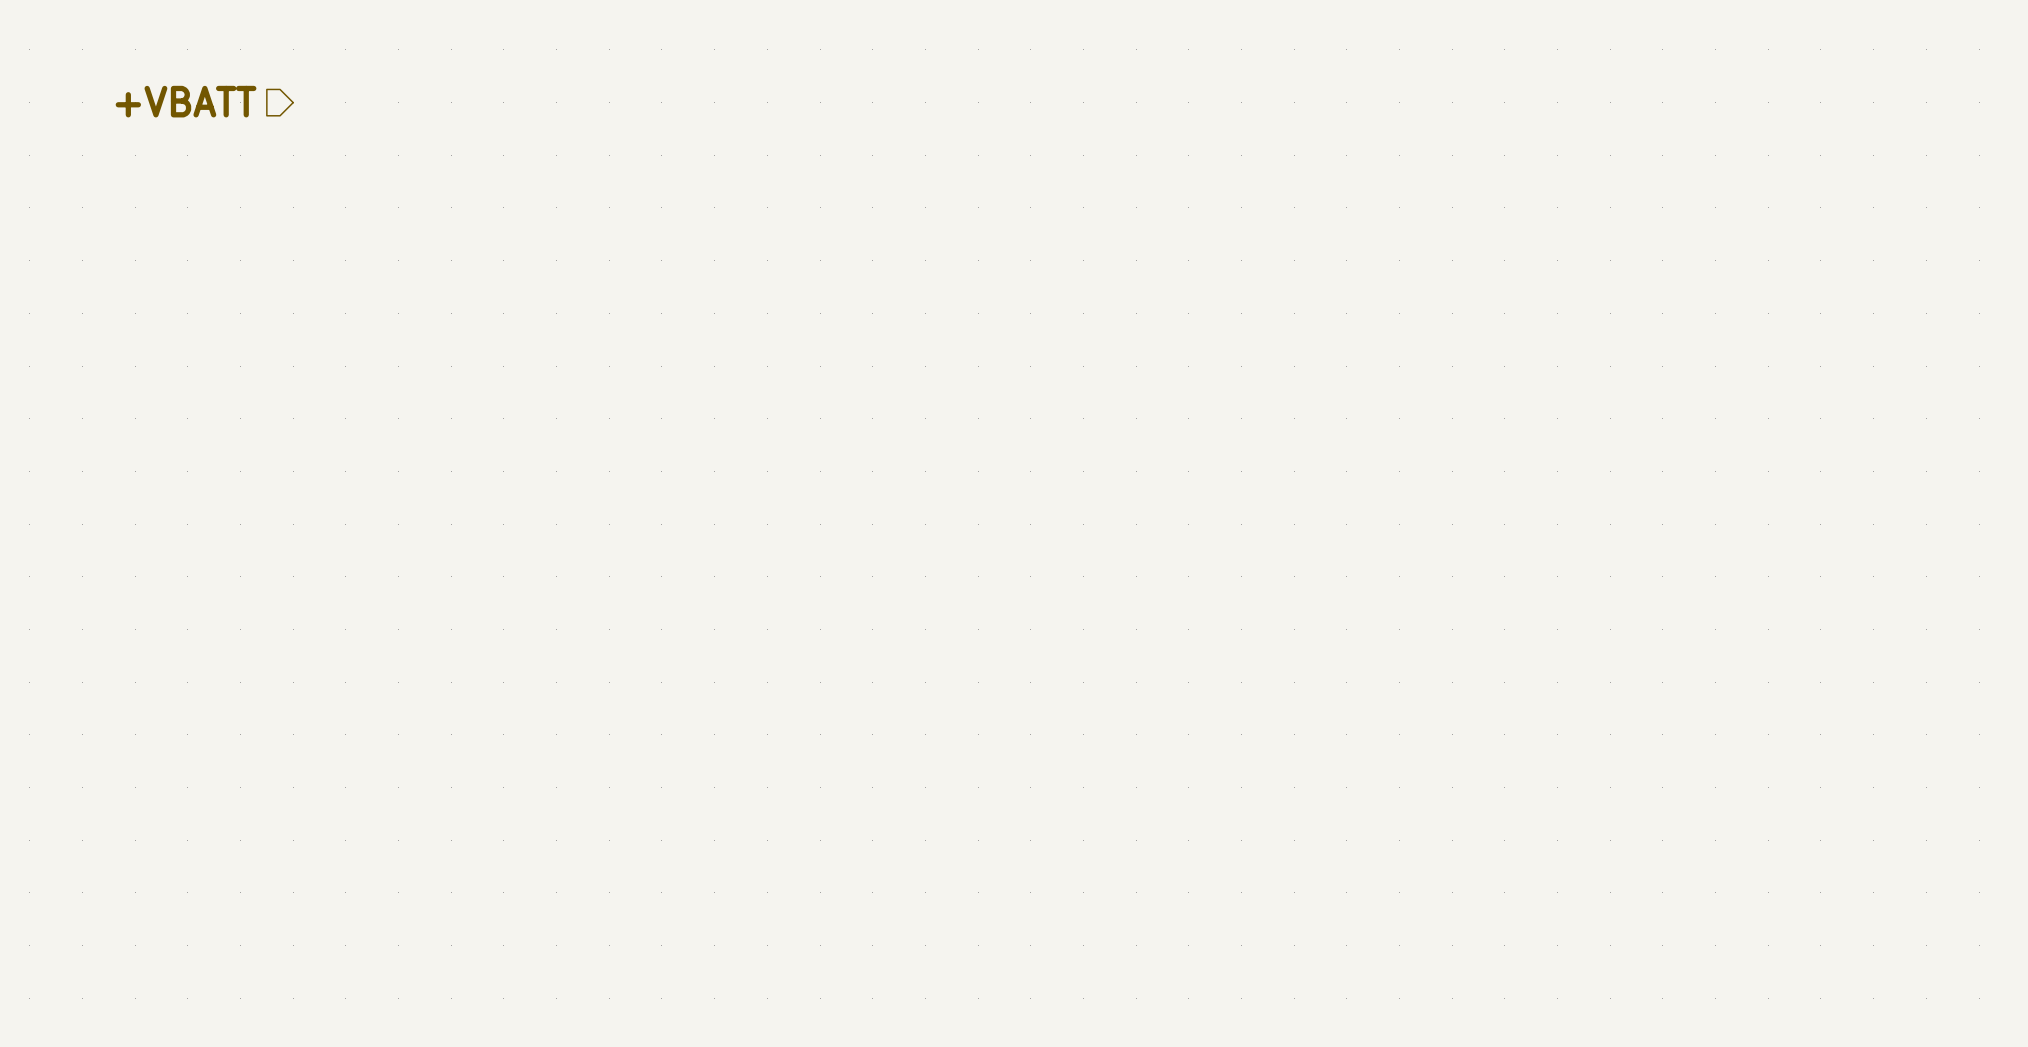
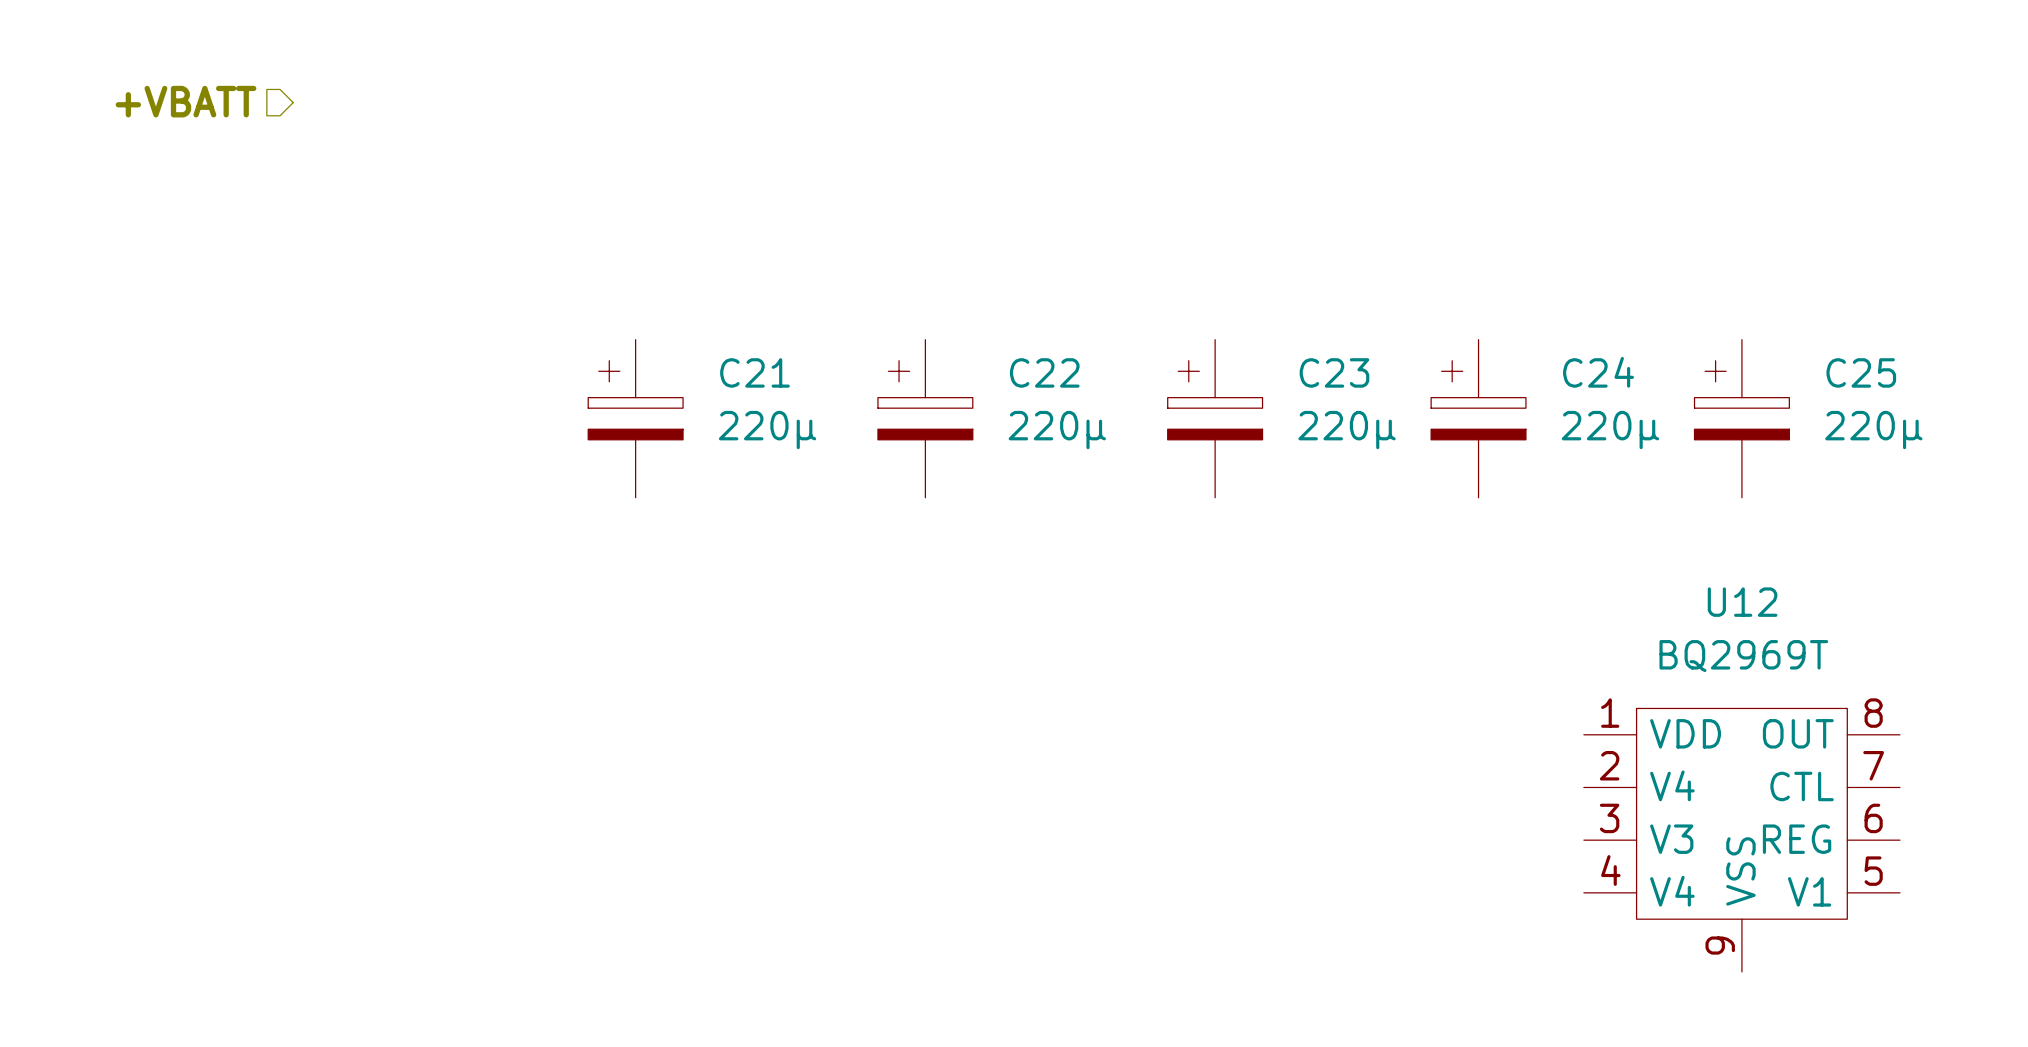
C21: none -> 220µ (635, 418)
C22: none -> 220µ (925, 418)
C23: none -> 220µ (1215, 418)
C24: none -> 220µ (1478, 418)
C25: none -> 220µ (1741, 418)
U12: none -> BQ2969T (1741, 840)

